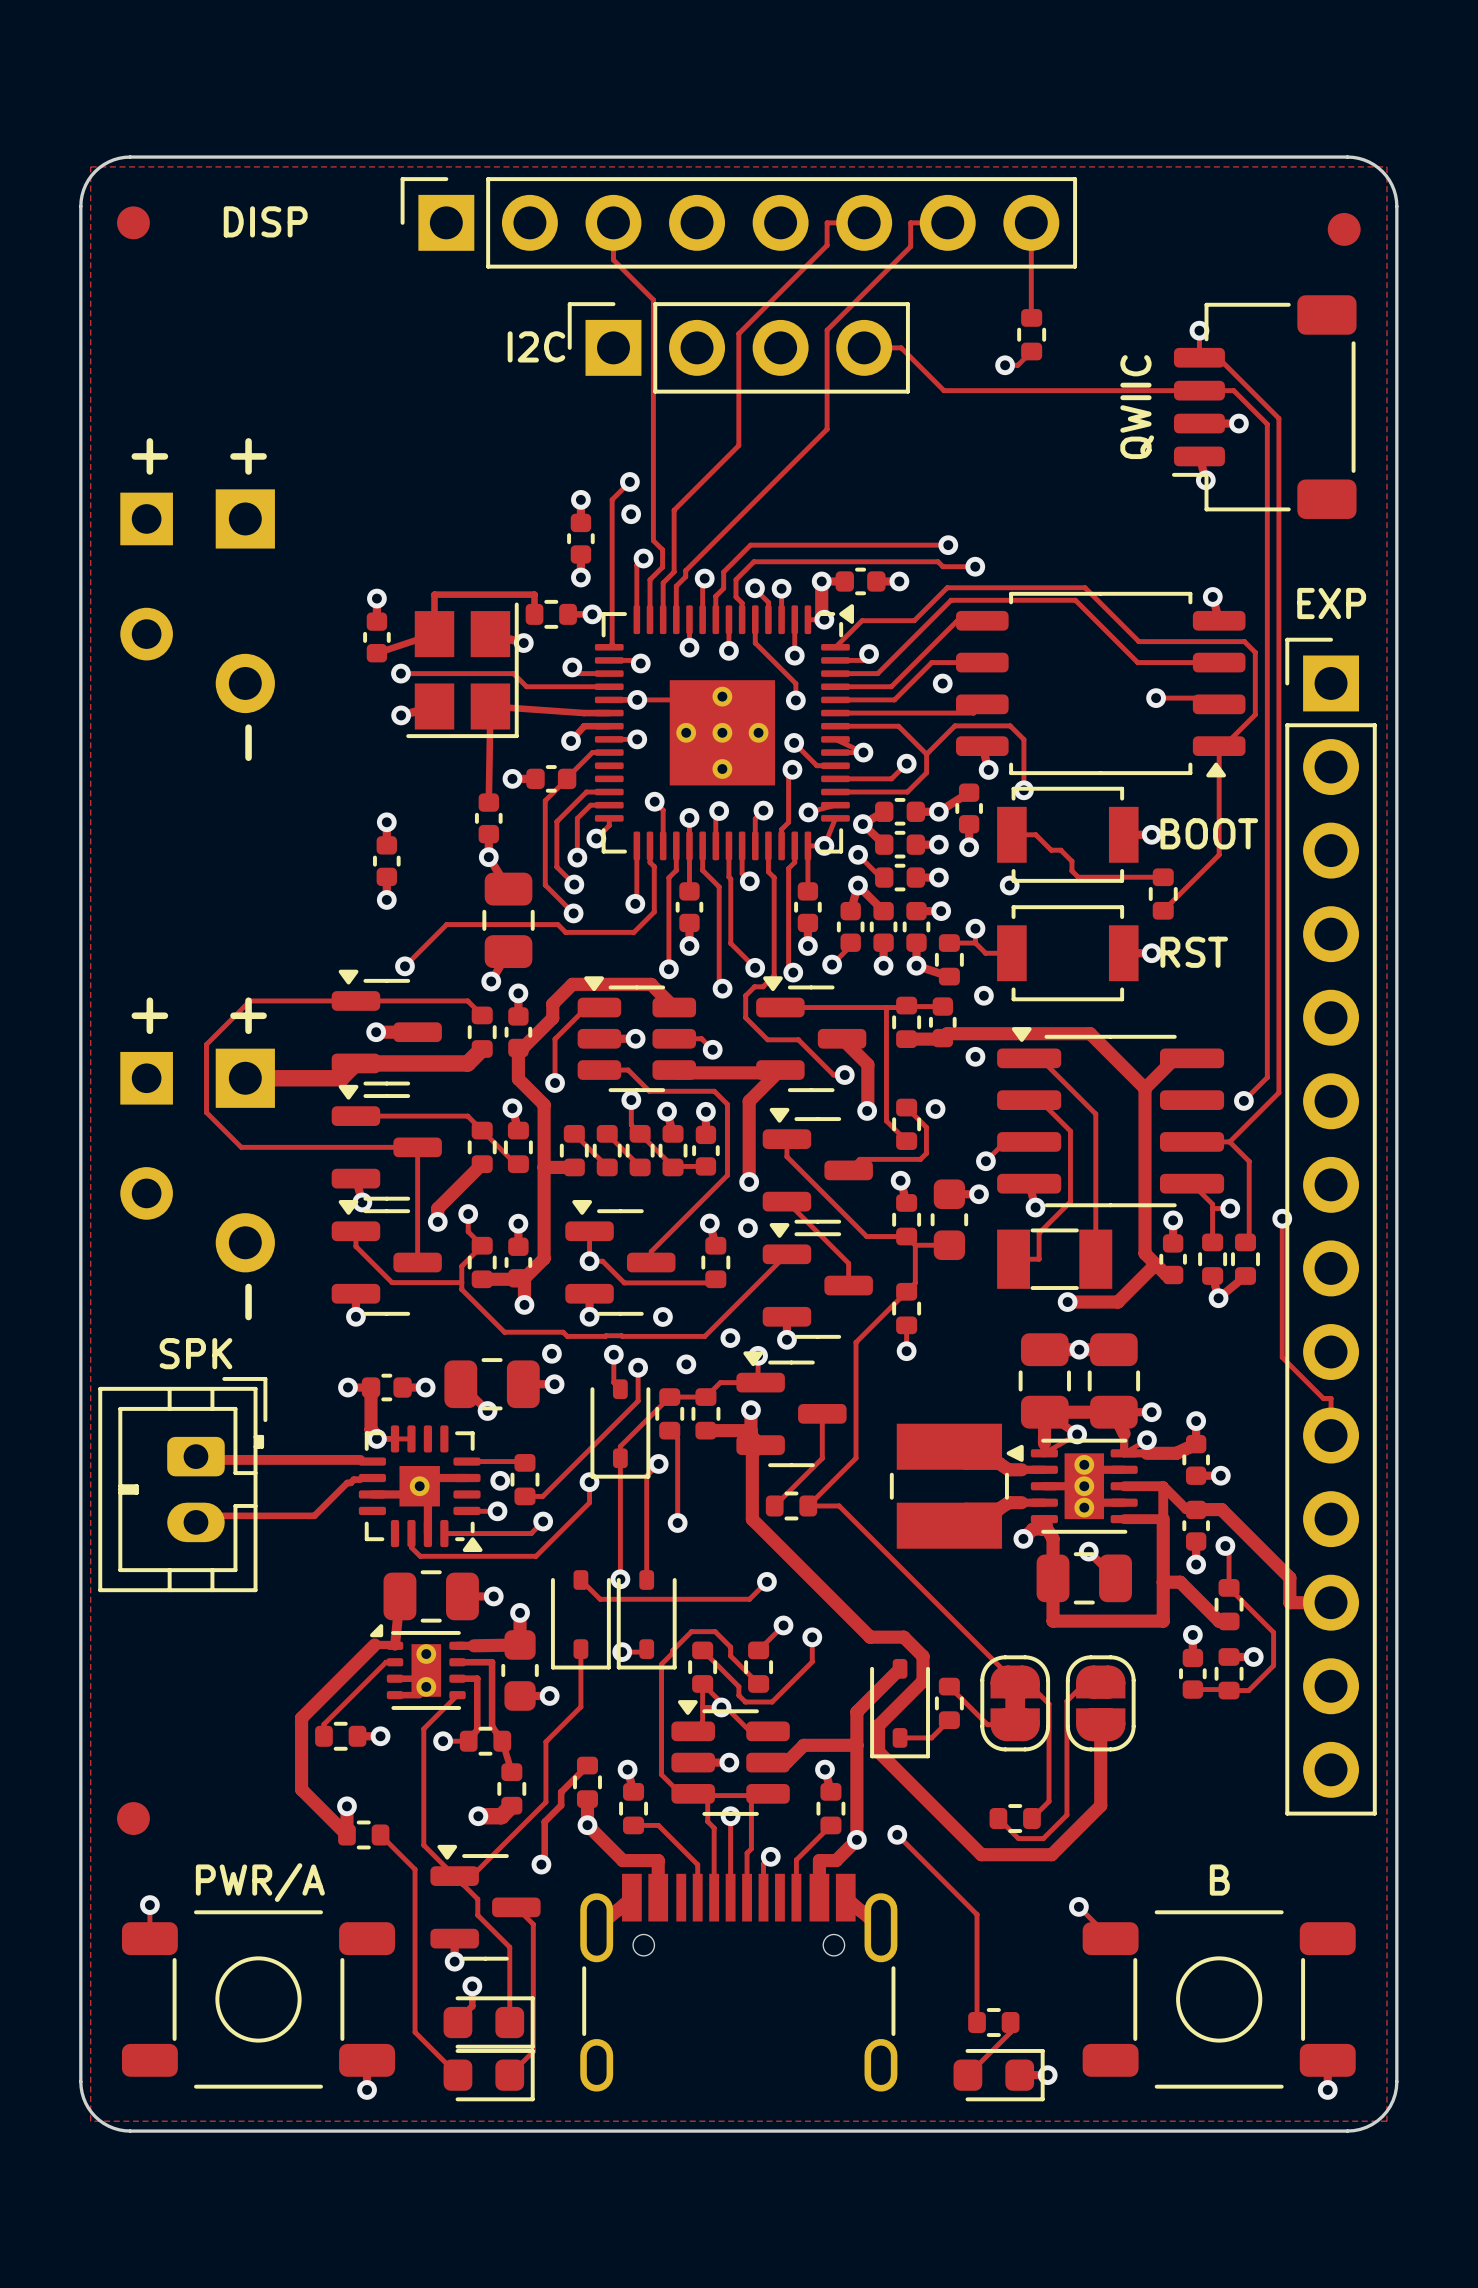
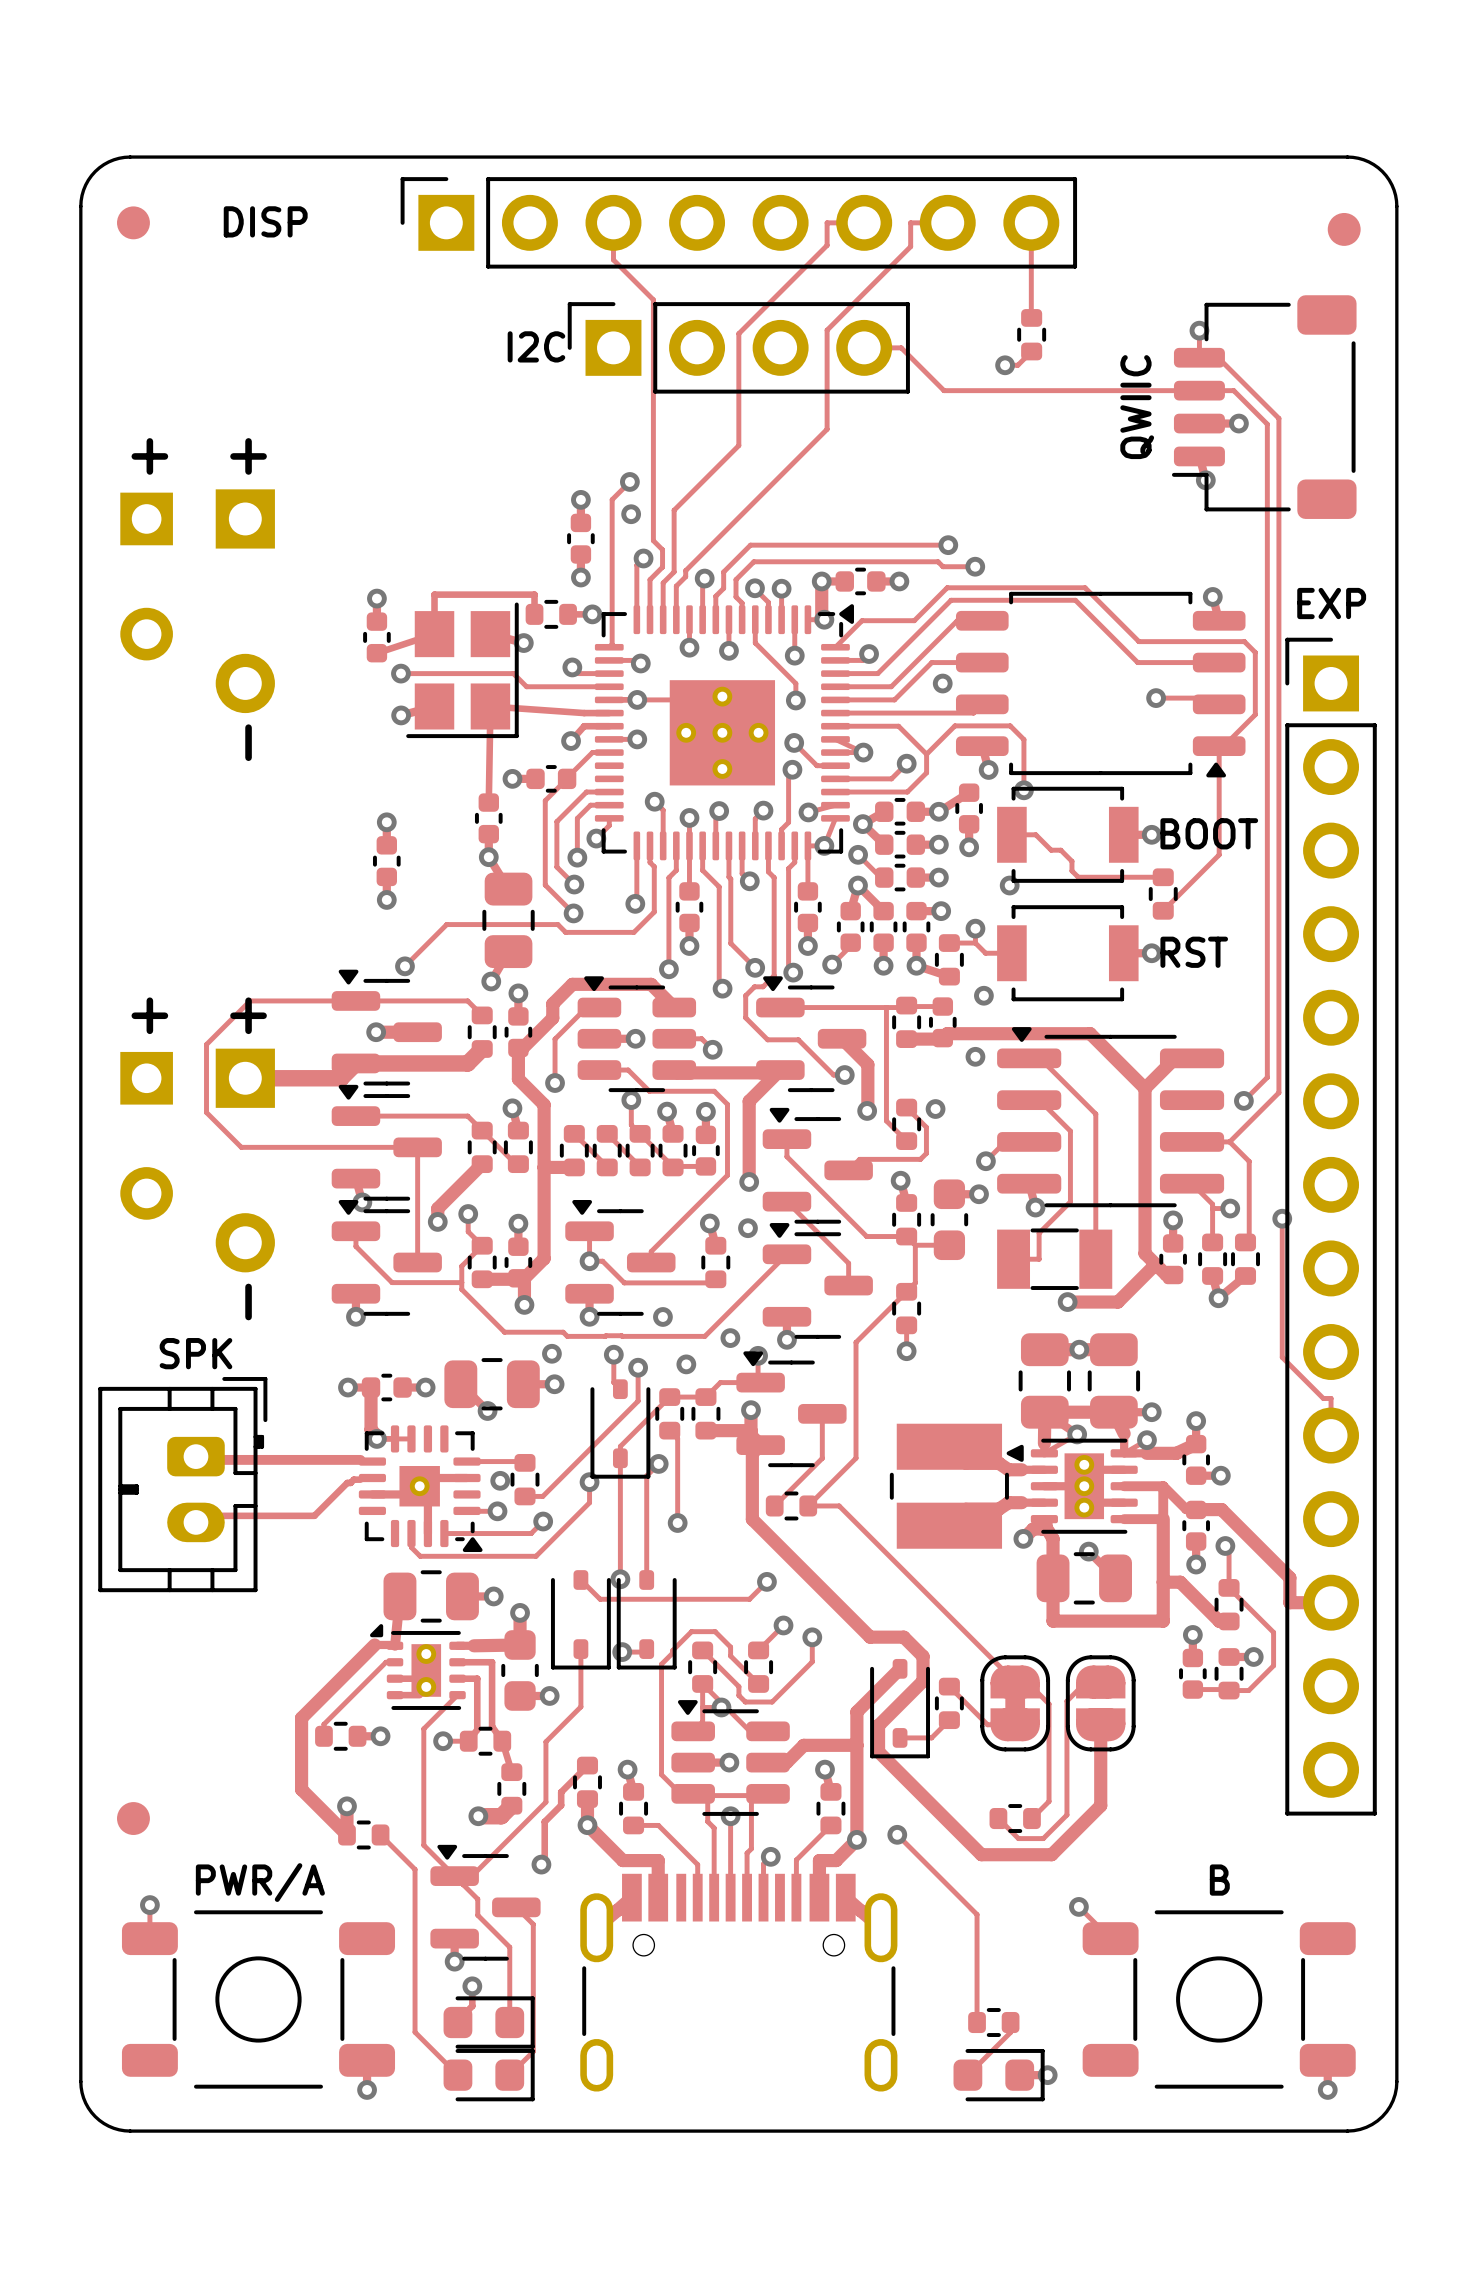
zone outline: (90, 166) (1386, 166) (1386, 2121) (90, 2121) (90, 166) -> none

